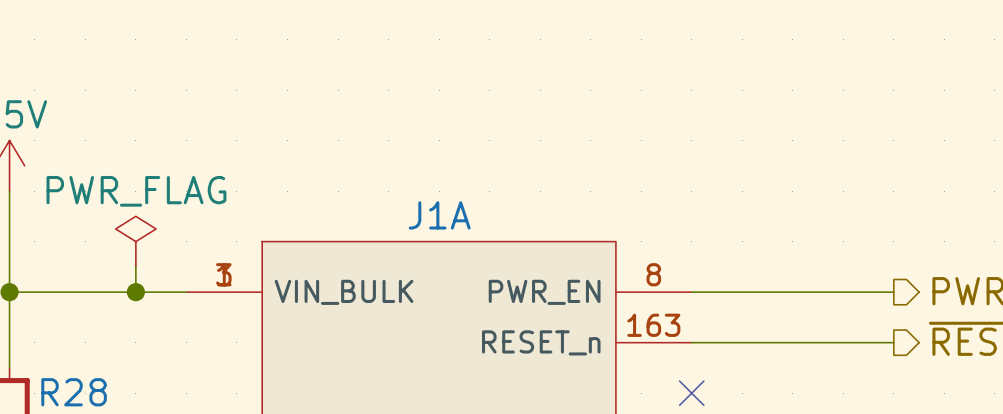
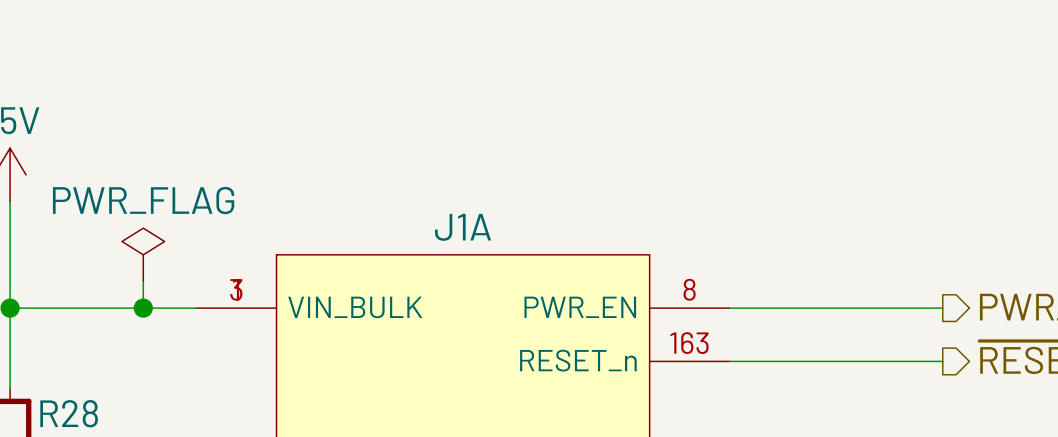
no-connect mark: (691, 393) -> none

